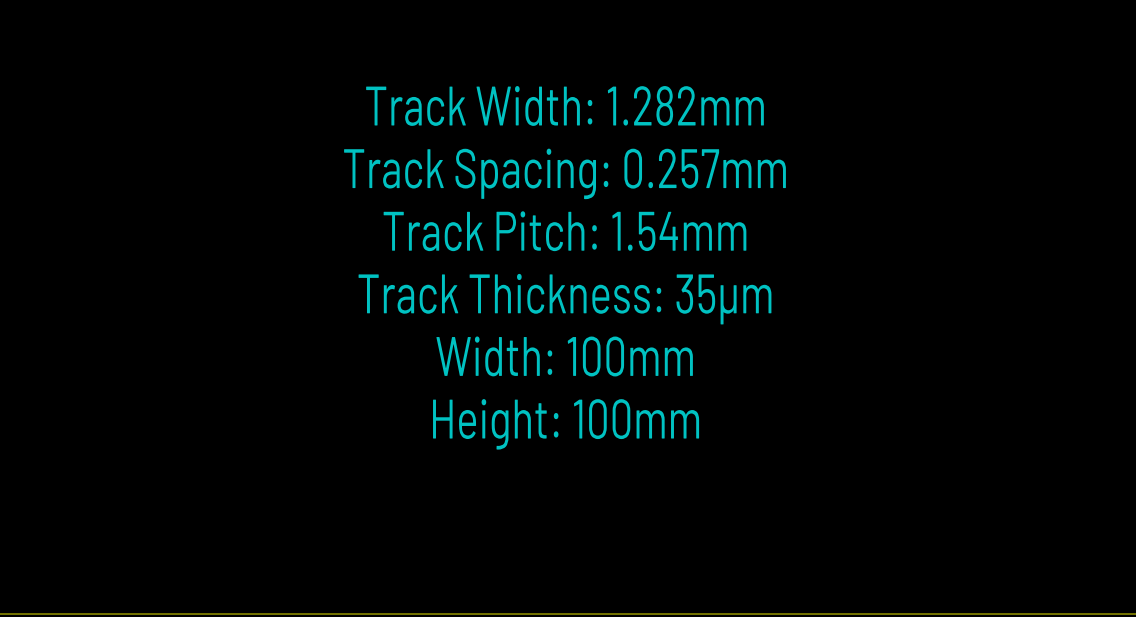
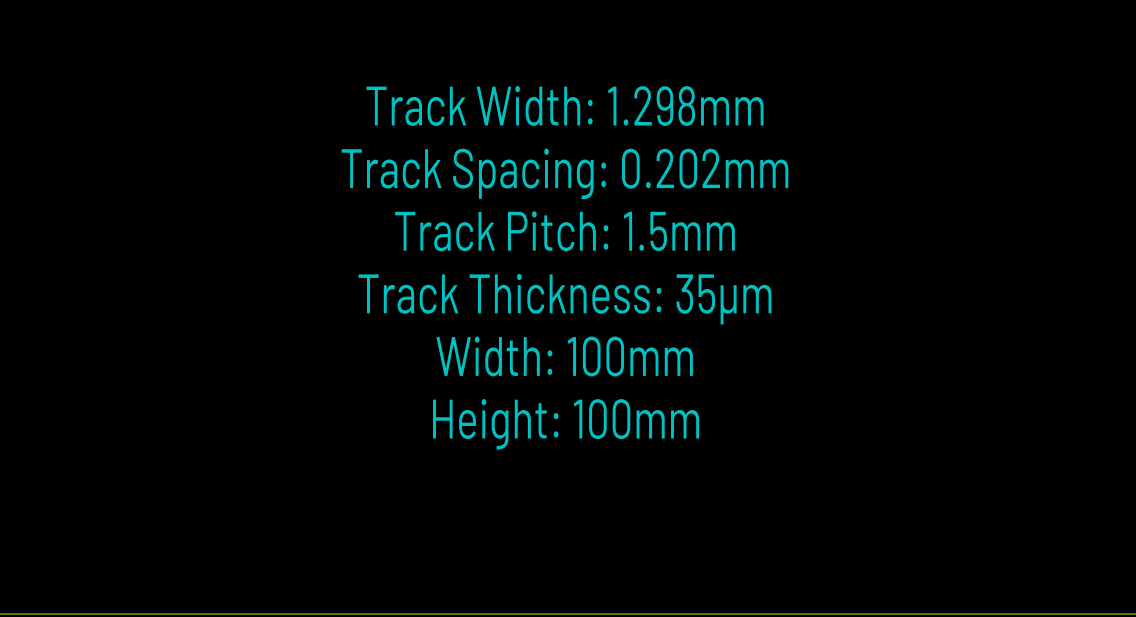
text: Track Width: 1.282mm (565, 105) -> Track Width: 1.298mm (565, 105)
text: Track Spacing: 0.257mm (565, 173) -> Track Spacing: 0.202mm (565, 173)
text: Track Pitch: 1.54mm (565, 231) -> Track Pitch: 1.5mm (565, 231)

